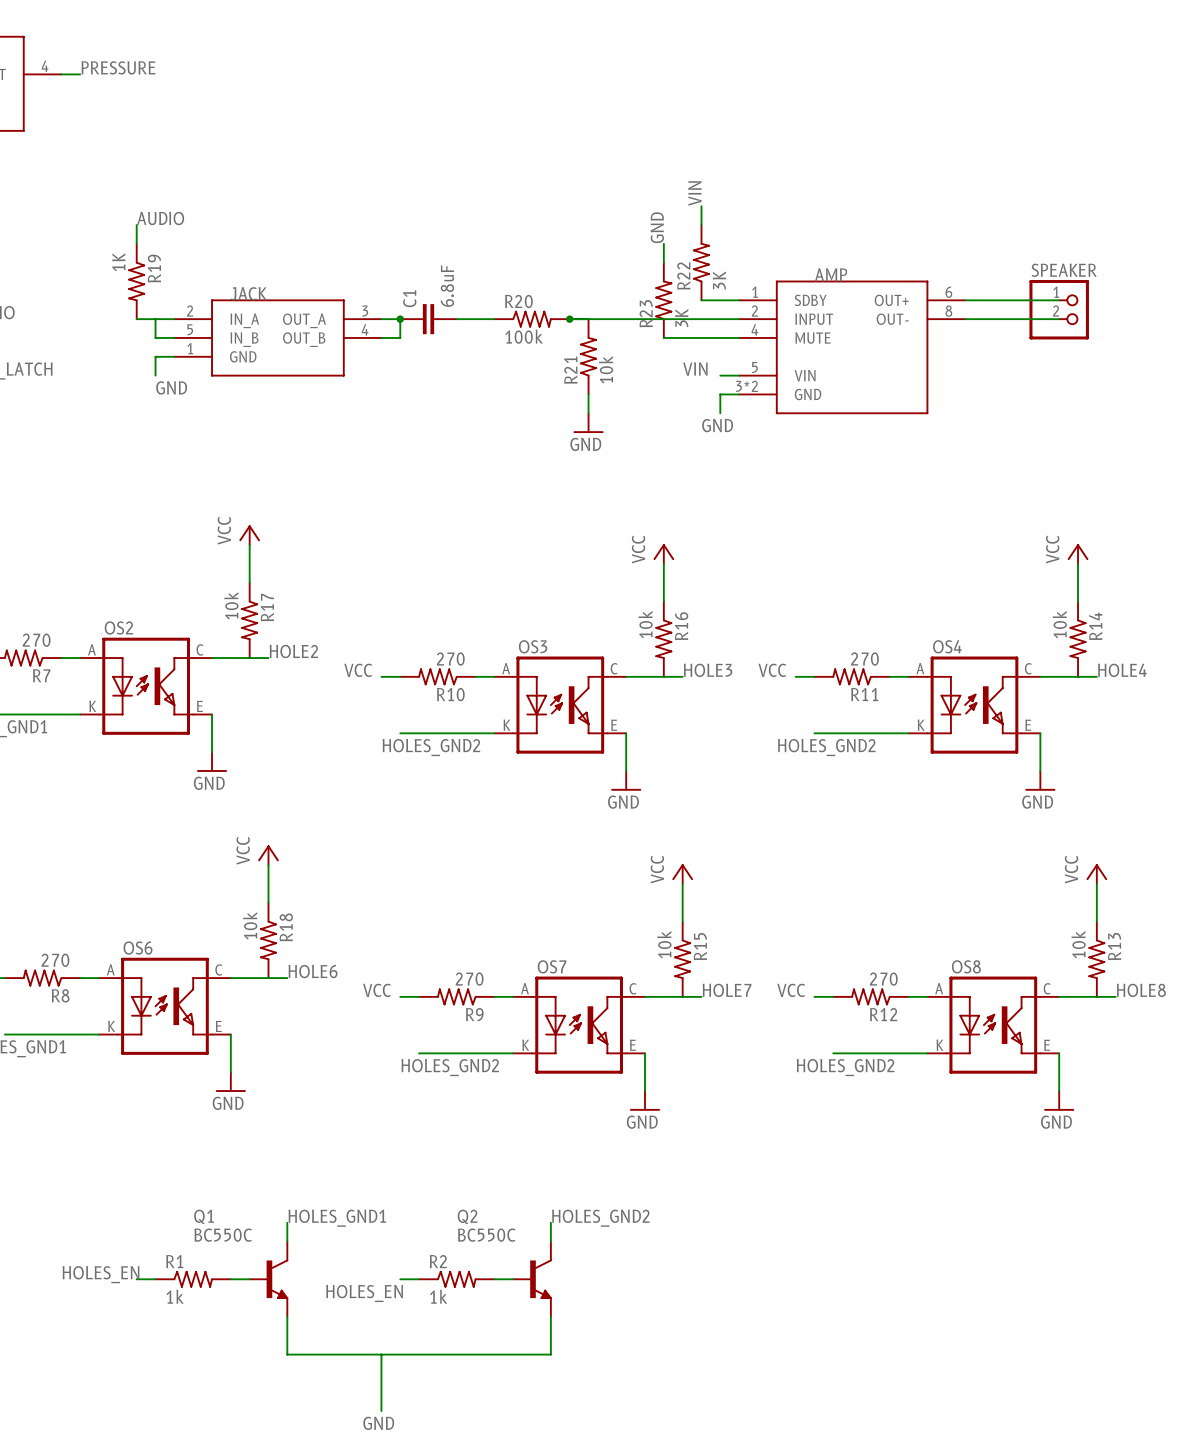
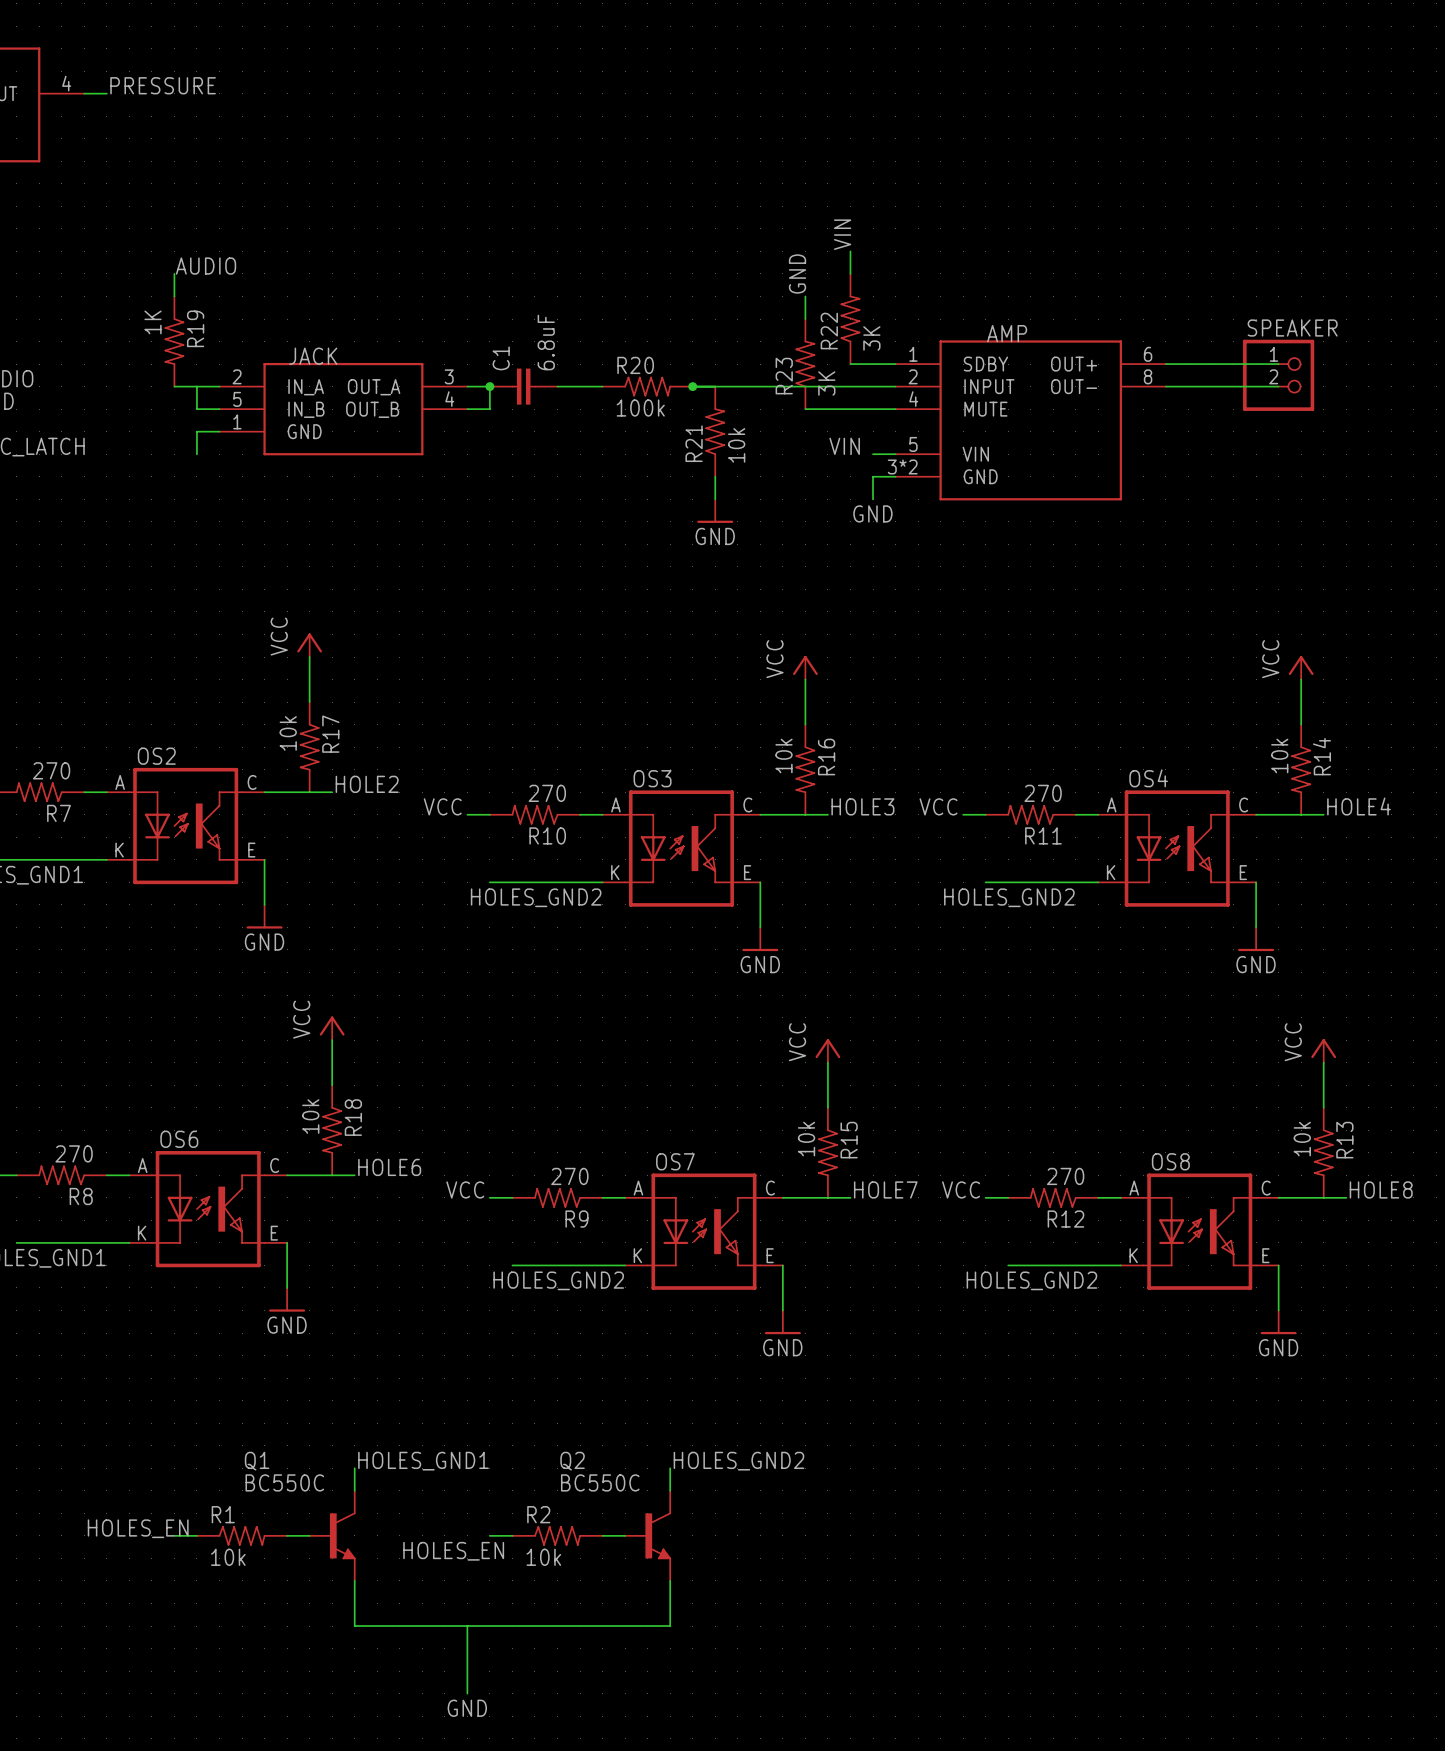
label: GND (171, 387) -> none
R1 value: 1k (175, 1296) -> 10k (228, 1557)
R2 value: 1k (438, 1296) -> 10k (543, 1557)

